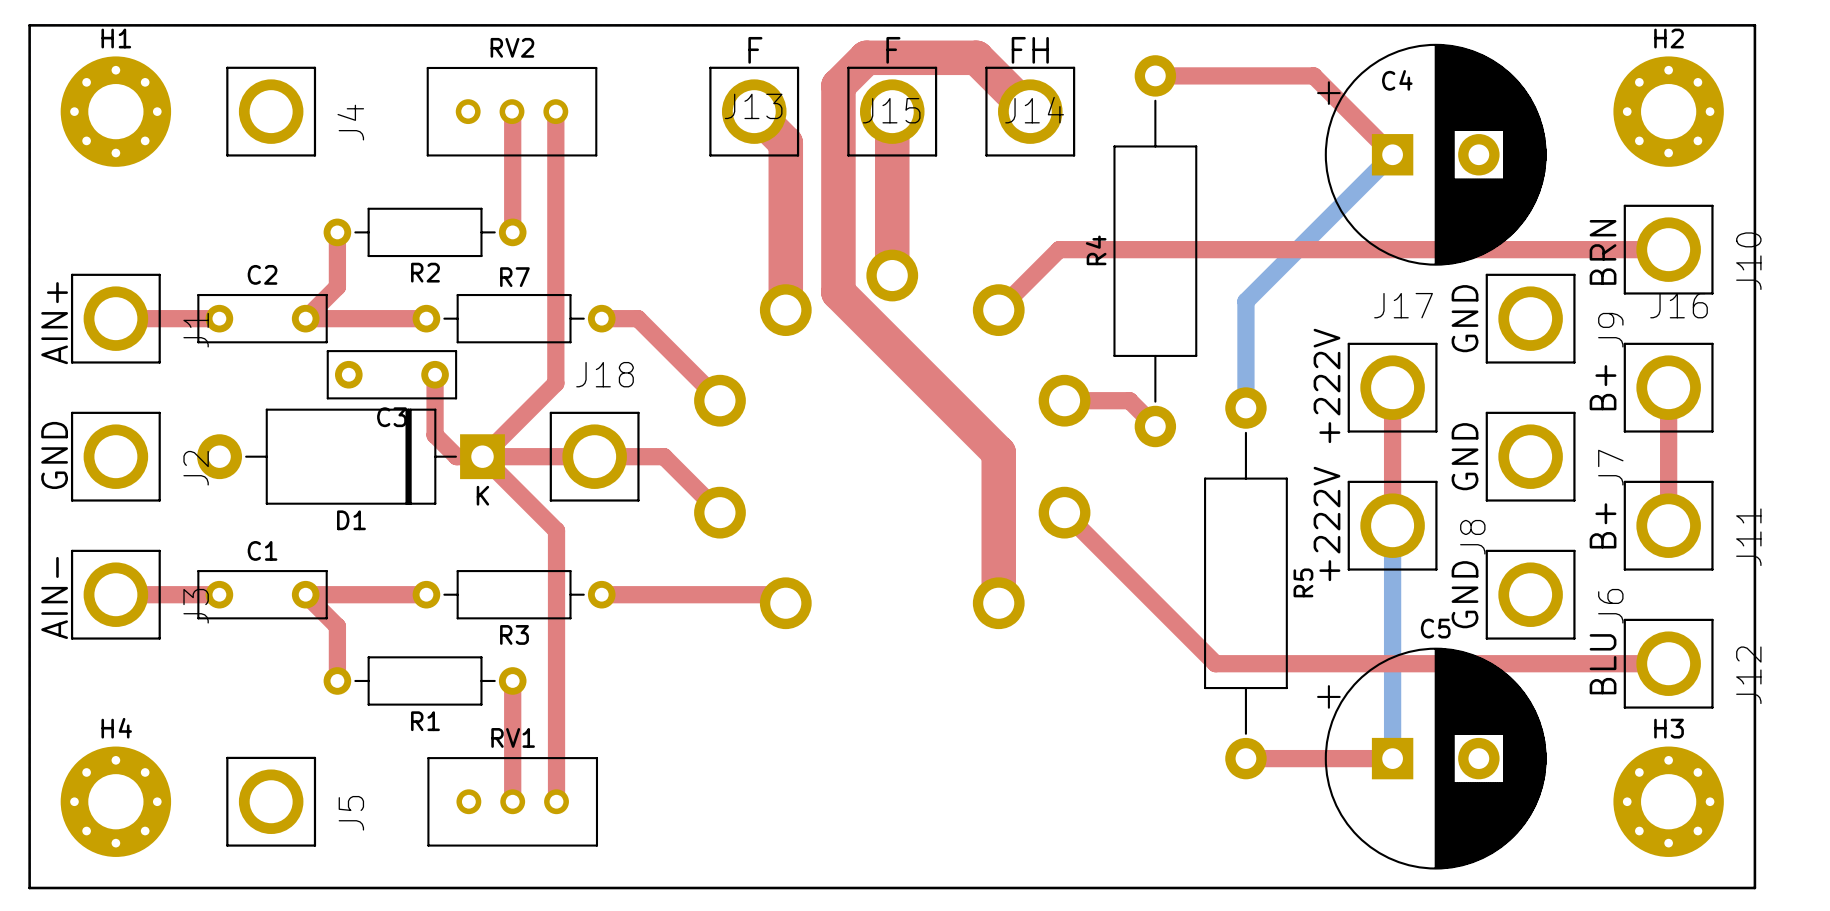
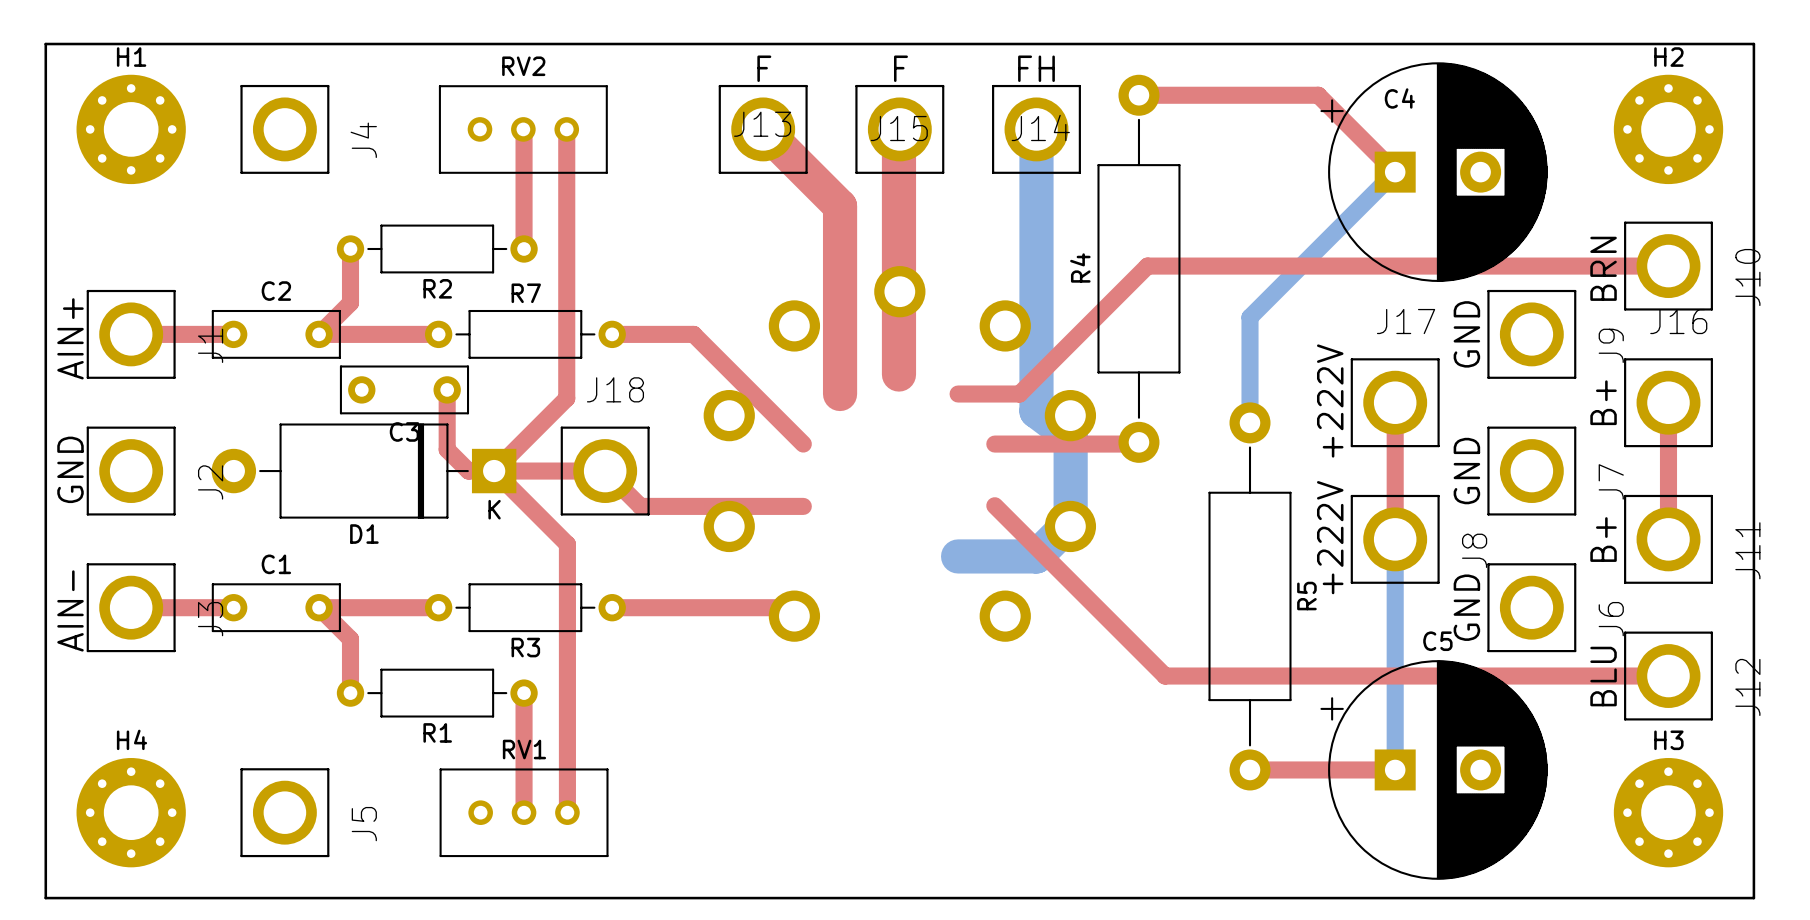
top track: (1155, 75) (1314, 77) -> (1138, 95) (1318, 95)
top track: (892, 111) (892, 275) -> (899, 129) (898, 374)
top track: (1030, 111) (976, 57) (866, 57) (838, 85) (838, 292) (998, 452) (998, 603) -> none
bottom track: none -> (1036, 129) (1036, 411) (1070, 436) (1070, 522) (1036, 556) (958, 556)
top track: (785, 143) (785, 310) -> (794, 160) (840, 206) (840, 394)
top track: (1142, 249) (1059, 249) (998, 310) -> (1147, 266) (1019, 394) (958, 394)
R4 position: (1155, 251) -> (1138, 268)
top track: (637, 318) (719, 400) -> (648, 334) (693, 334) (803, 444)
top track: (1064, 400) (1129, 400) (1155, 426) -> none
top track: none -> (1138, 442) (1137, 444) (994, 444)
top track: (594, 456) (663, 456) (719, 512) -> (605, 471) (640, 506) (803, 506)
top track: (1064, 512) (1215, 663) -> (994, 505) (1165, 676) (1219, 676)

